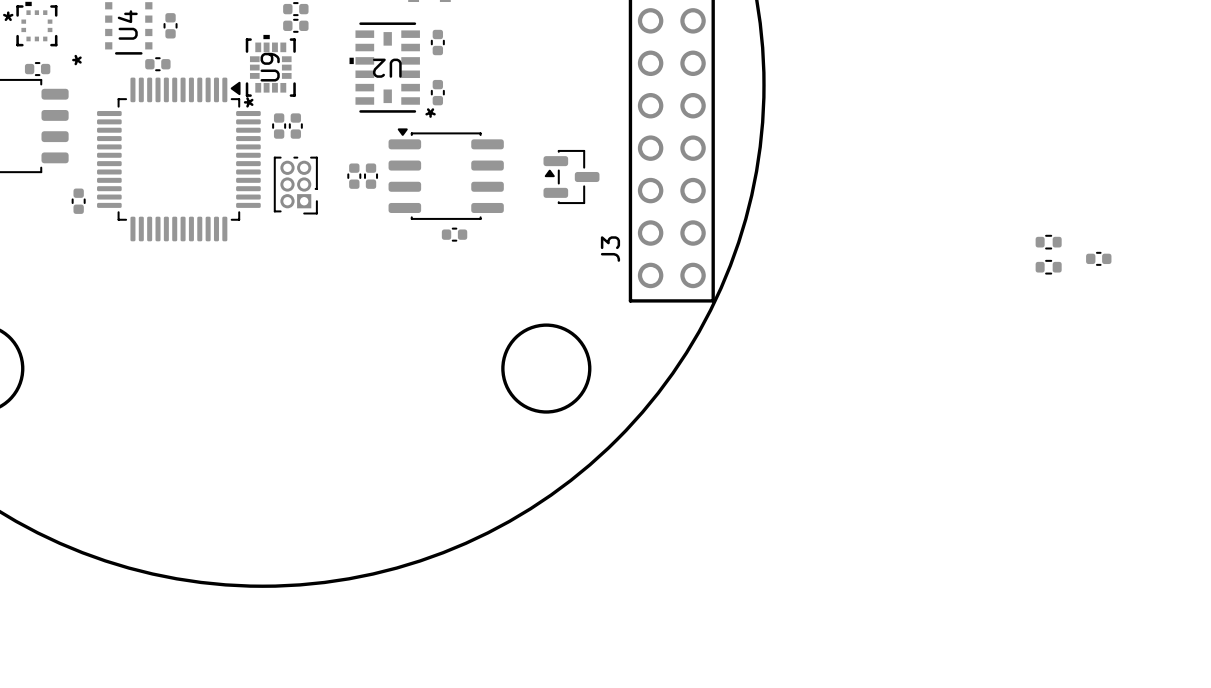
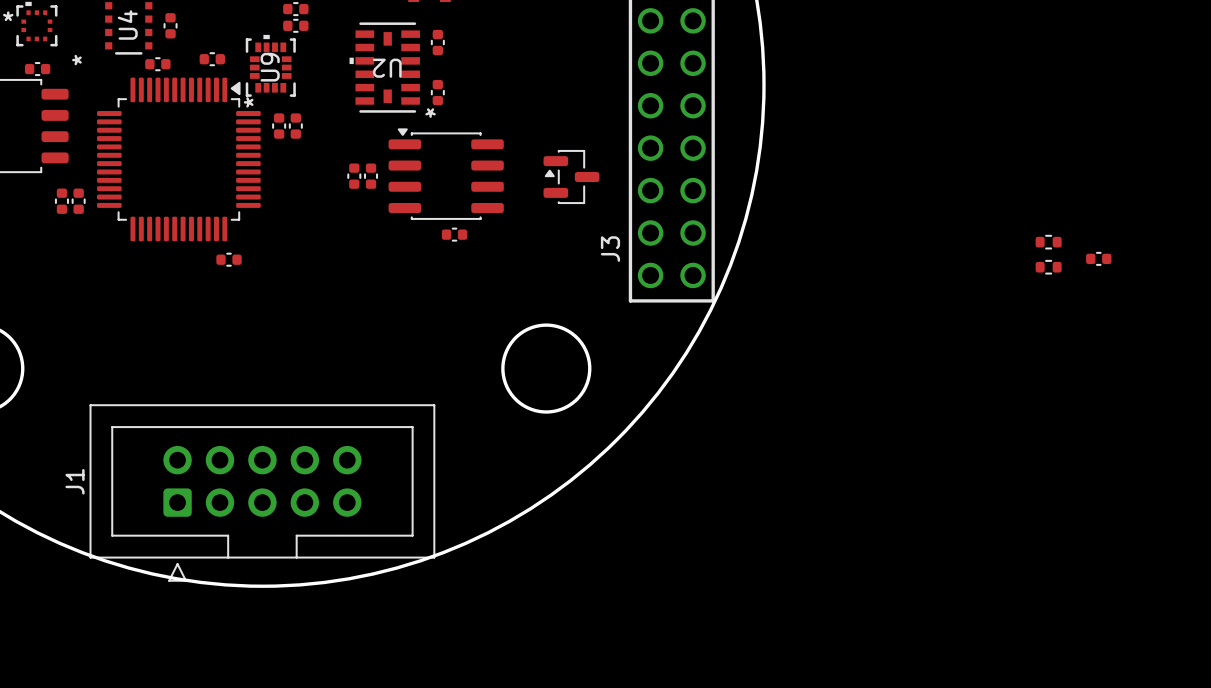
part: none -> (212, 59)
part: (295, 185) -> none
part: none -> (61, 201)
part: none -> (229, 259)
J1: none -> (262, 492)

